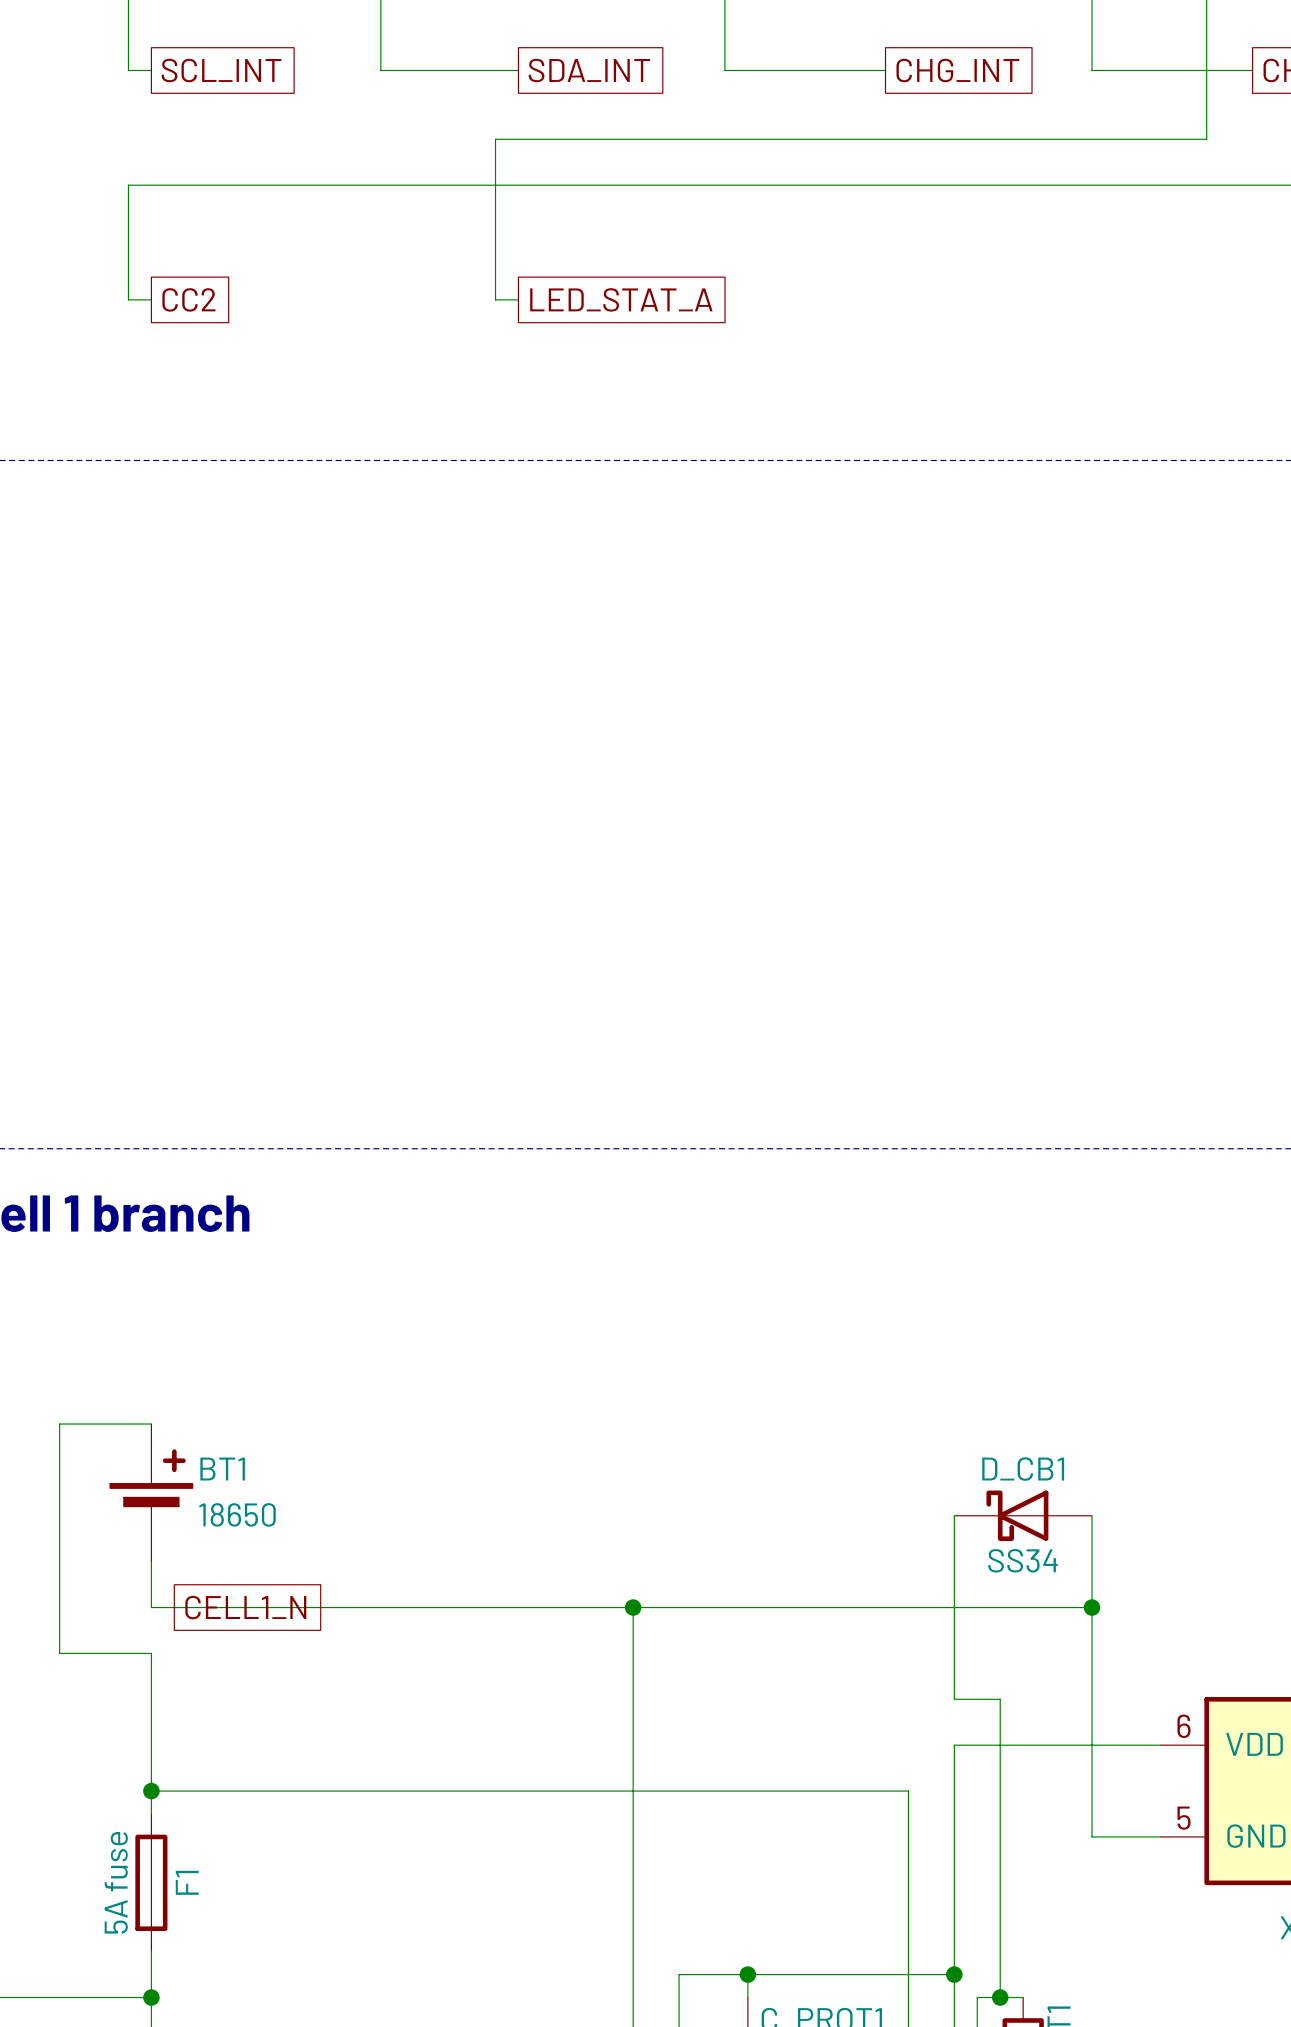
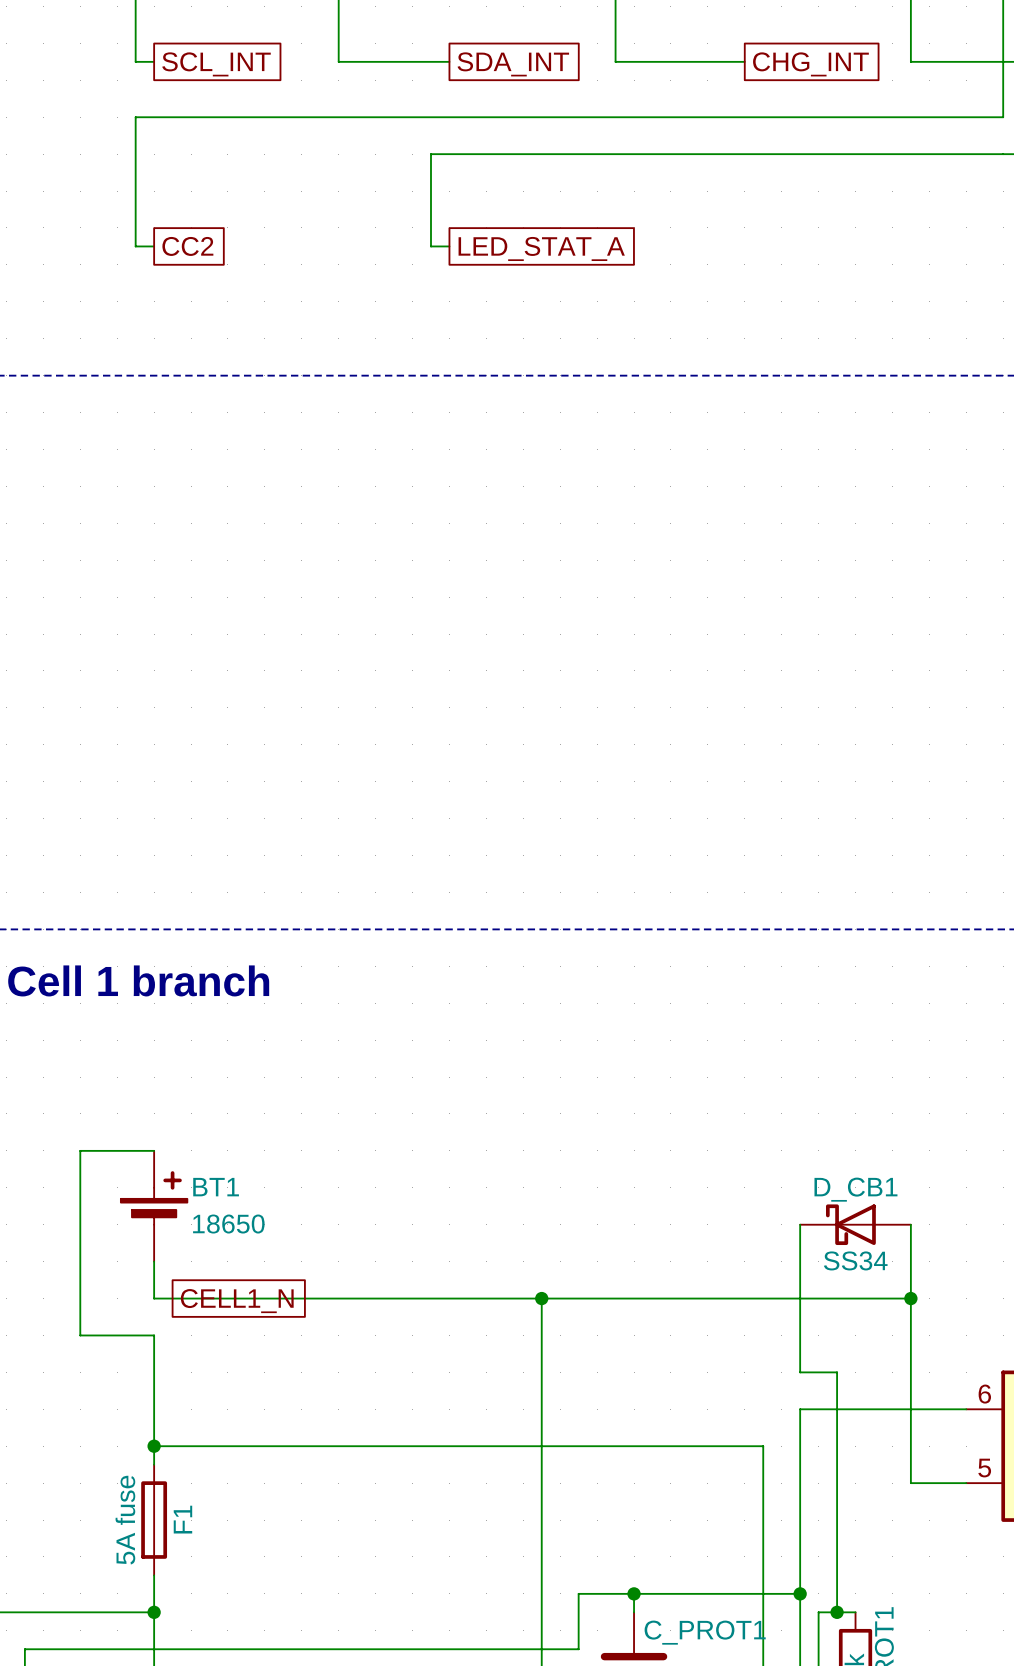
wire: (495, 139) (495, 185) (128, 185) -> (430, 117) (135, 117) (135, 154)

